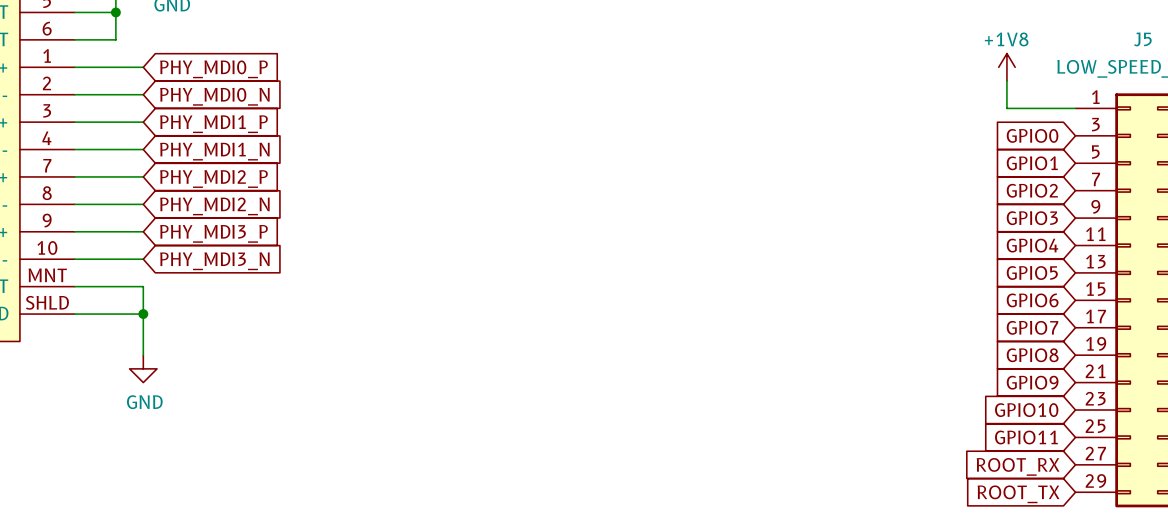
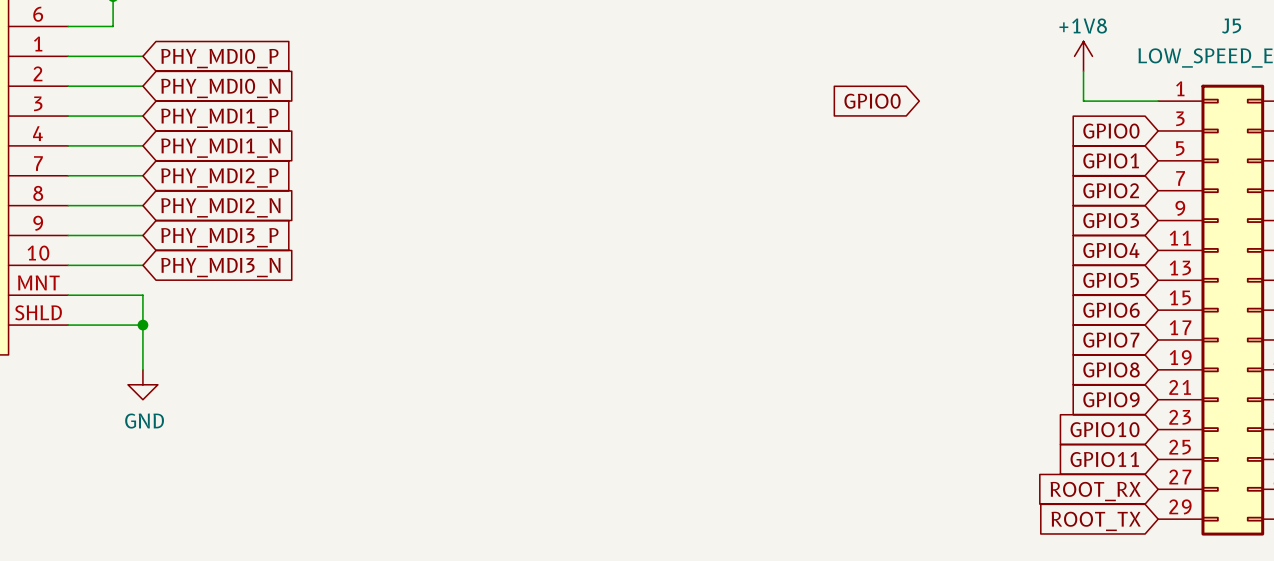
global label: none -> GPIO0 (872, 101)

